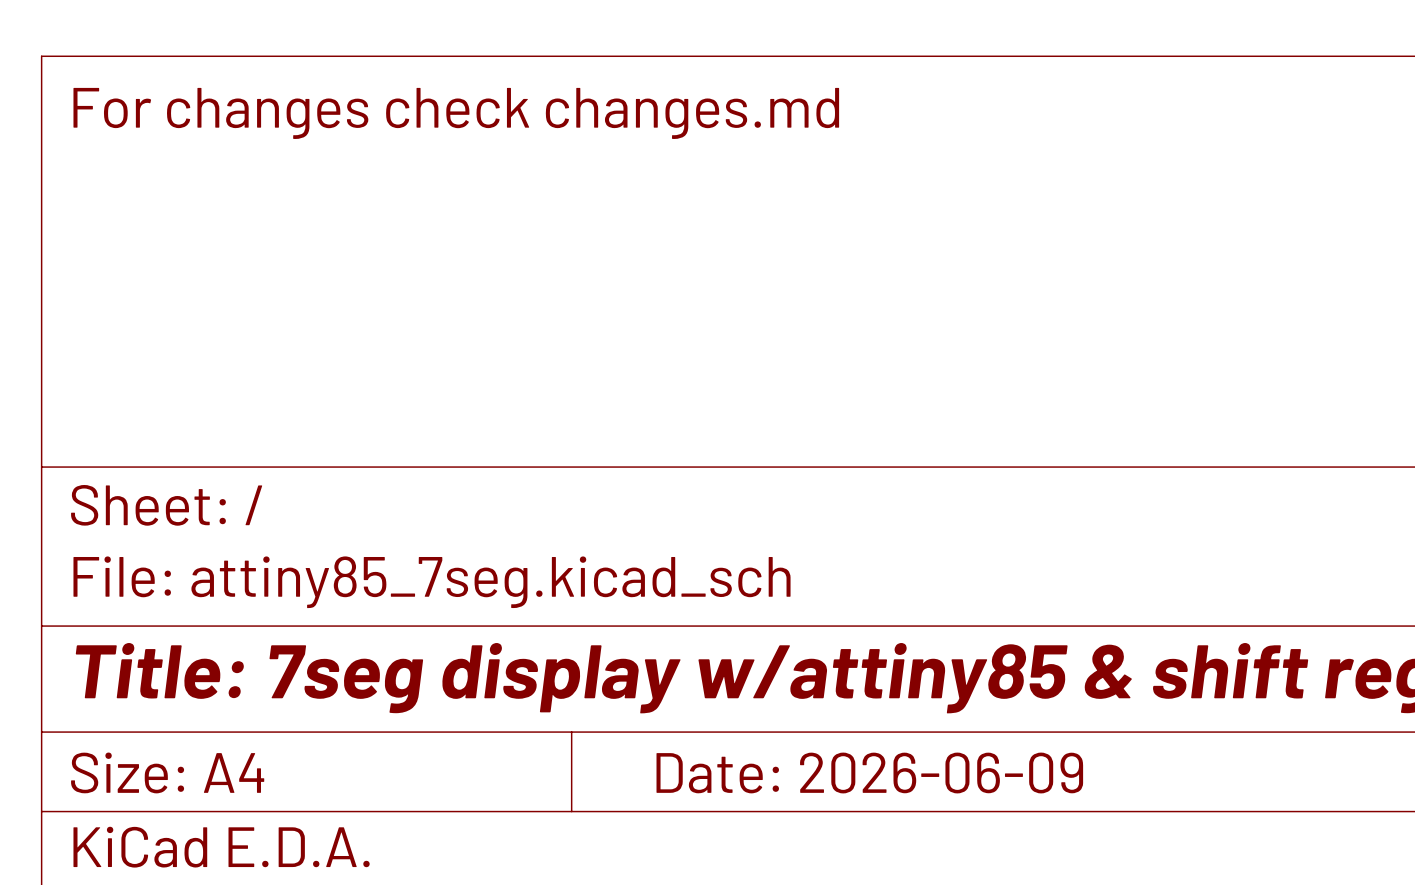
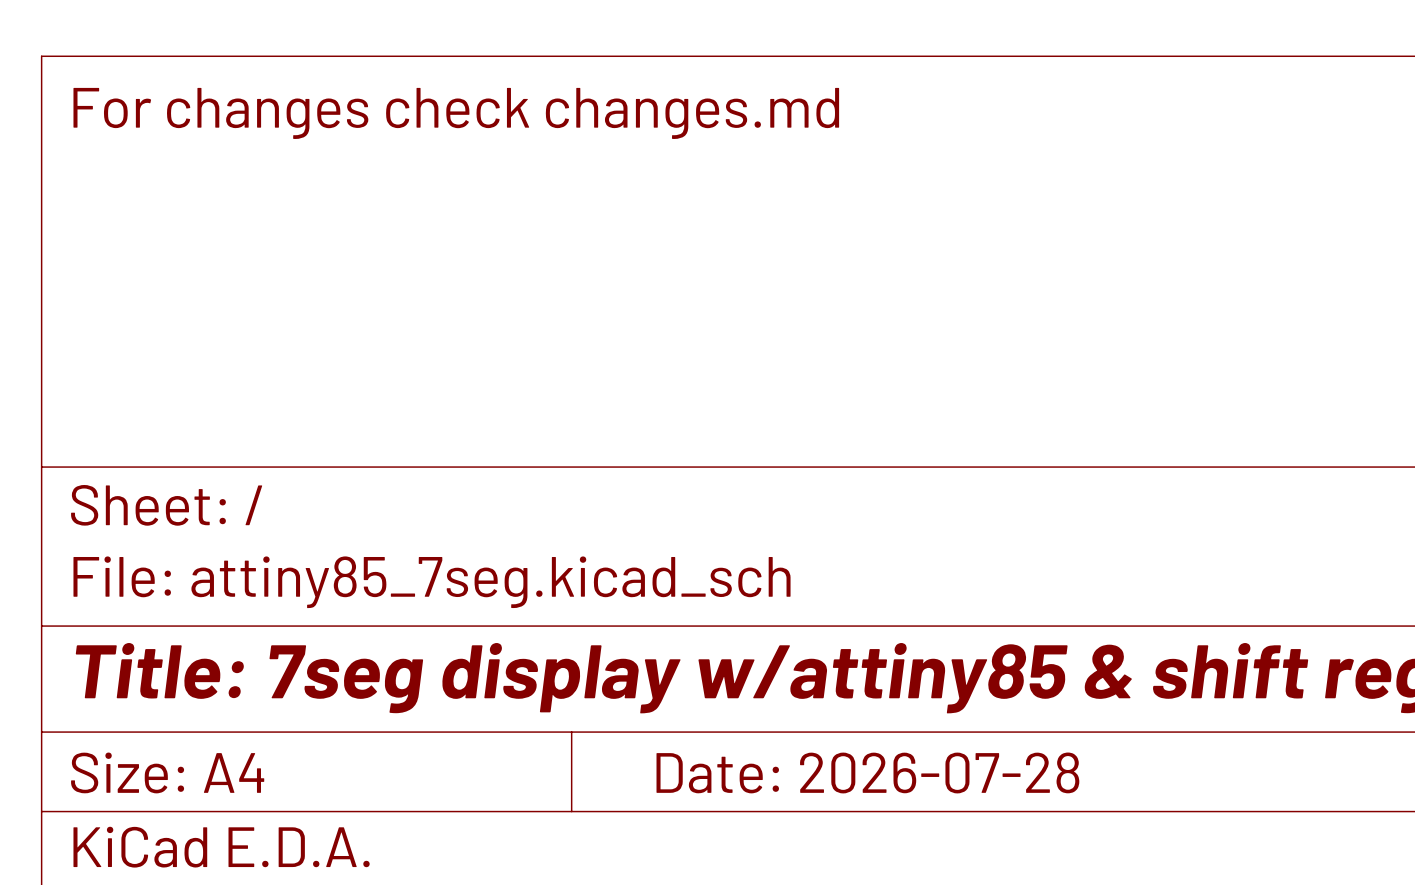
title block: Date: 2026-06-09 (869, 773) -> Date: 2026-07-28 (867, 772)

